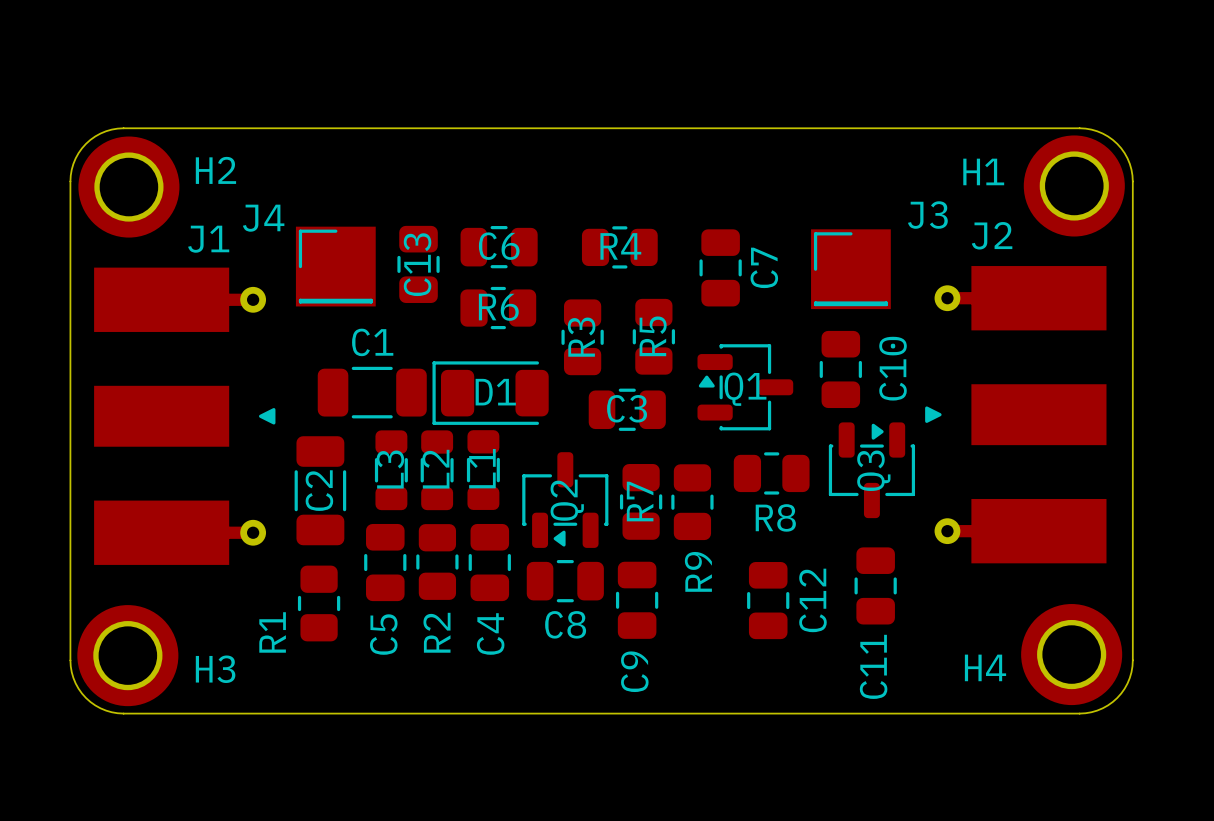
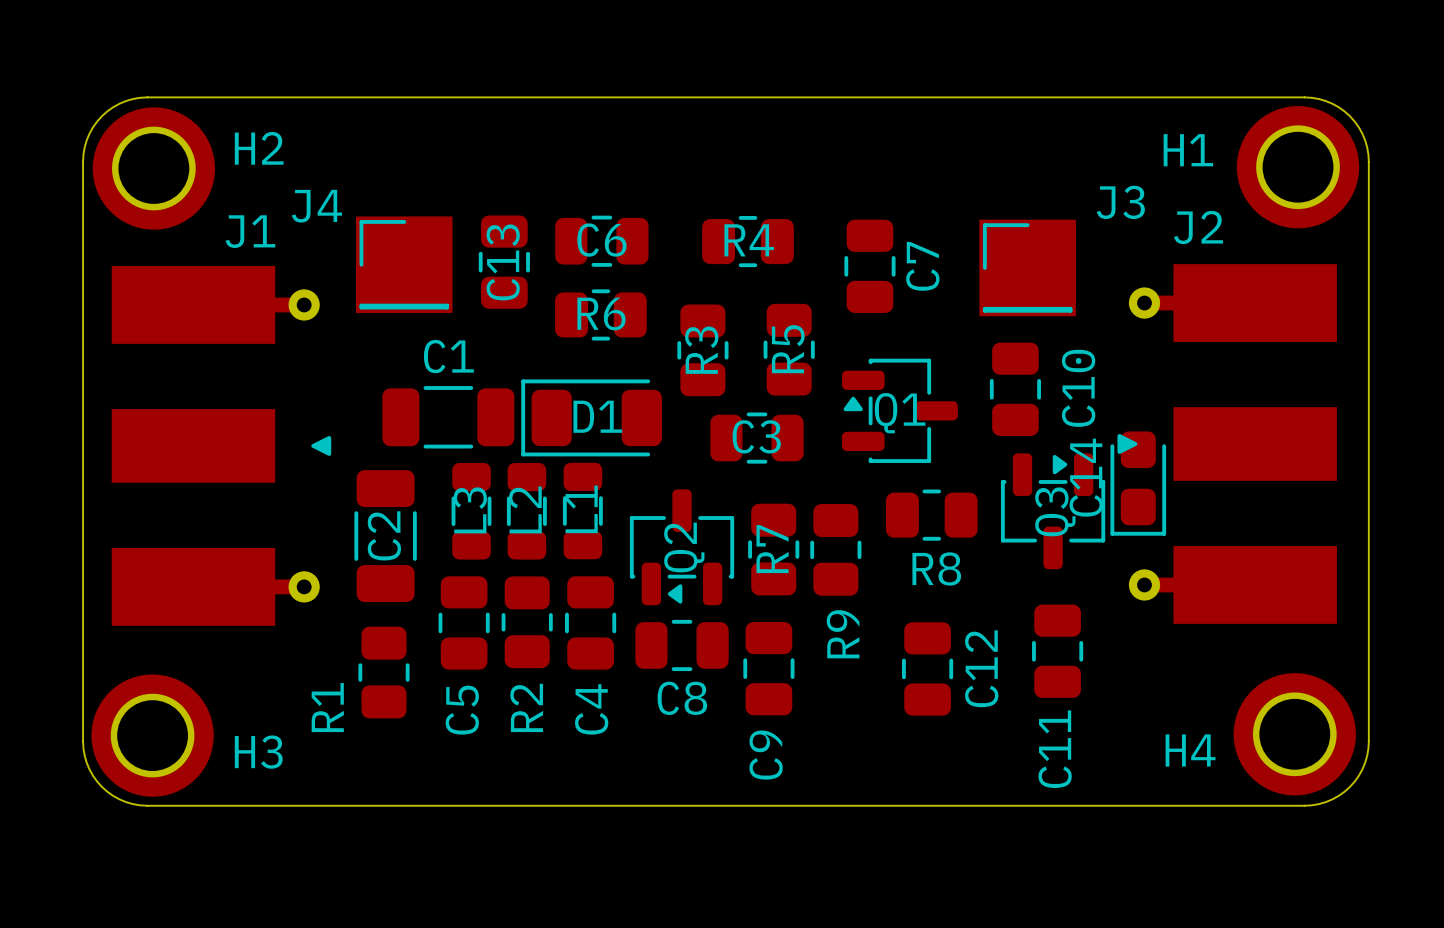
C14: none -> (1138, 483)

